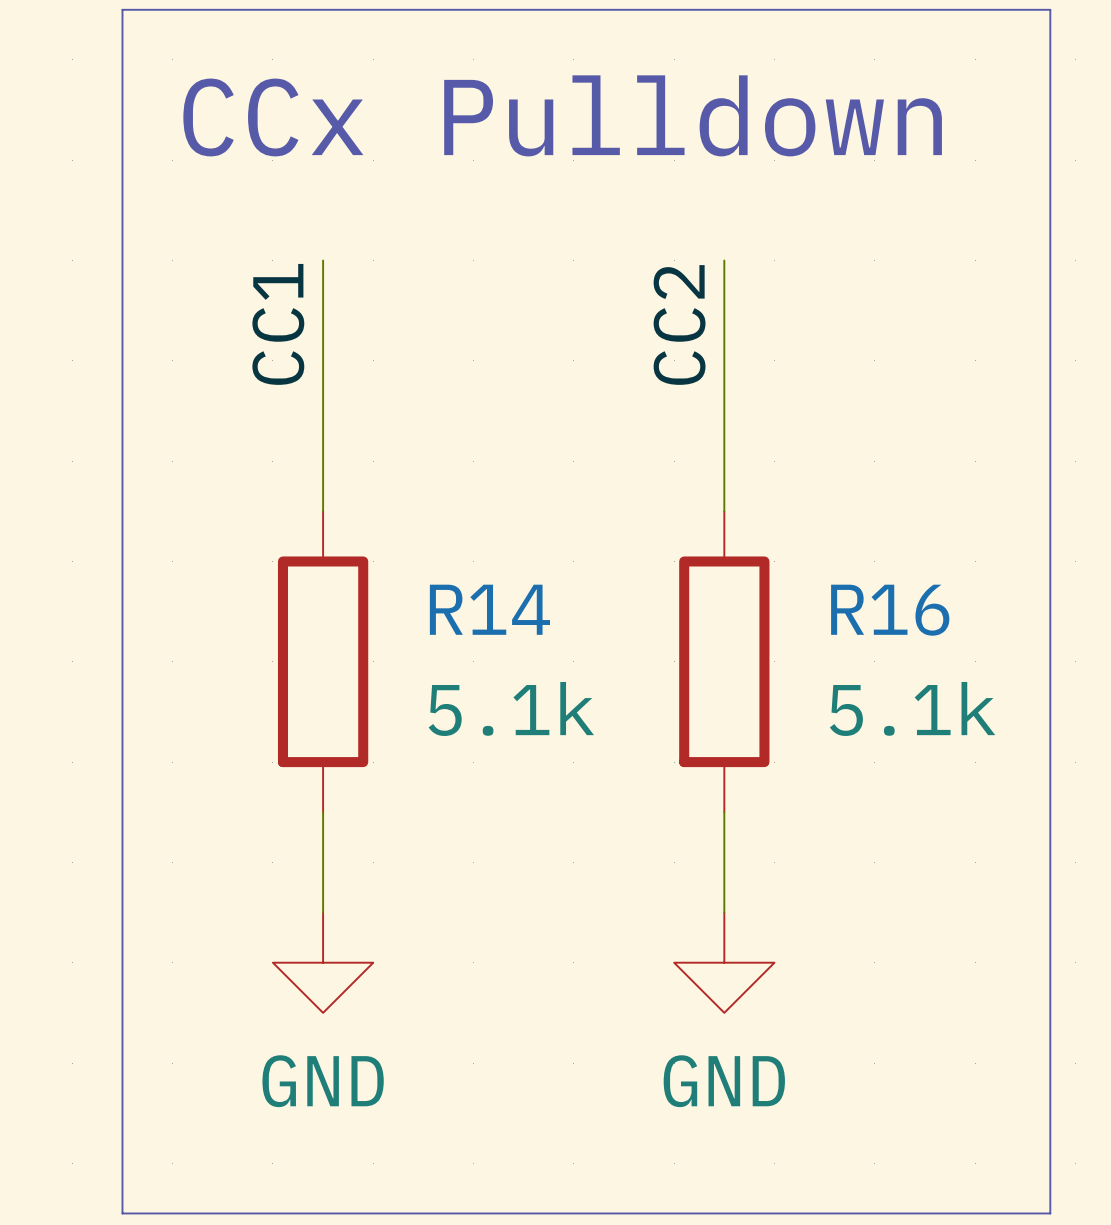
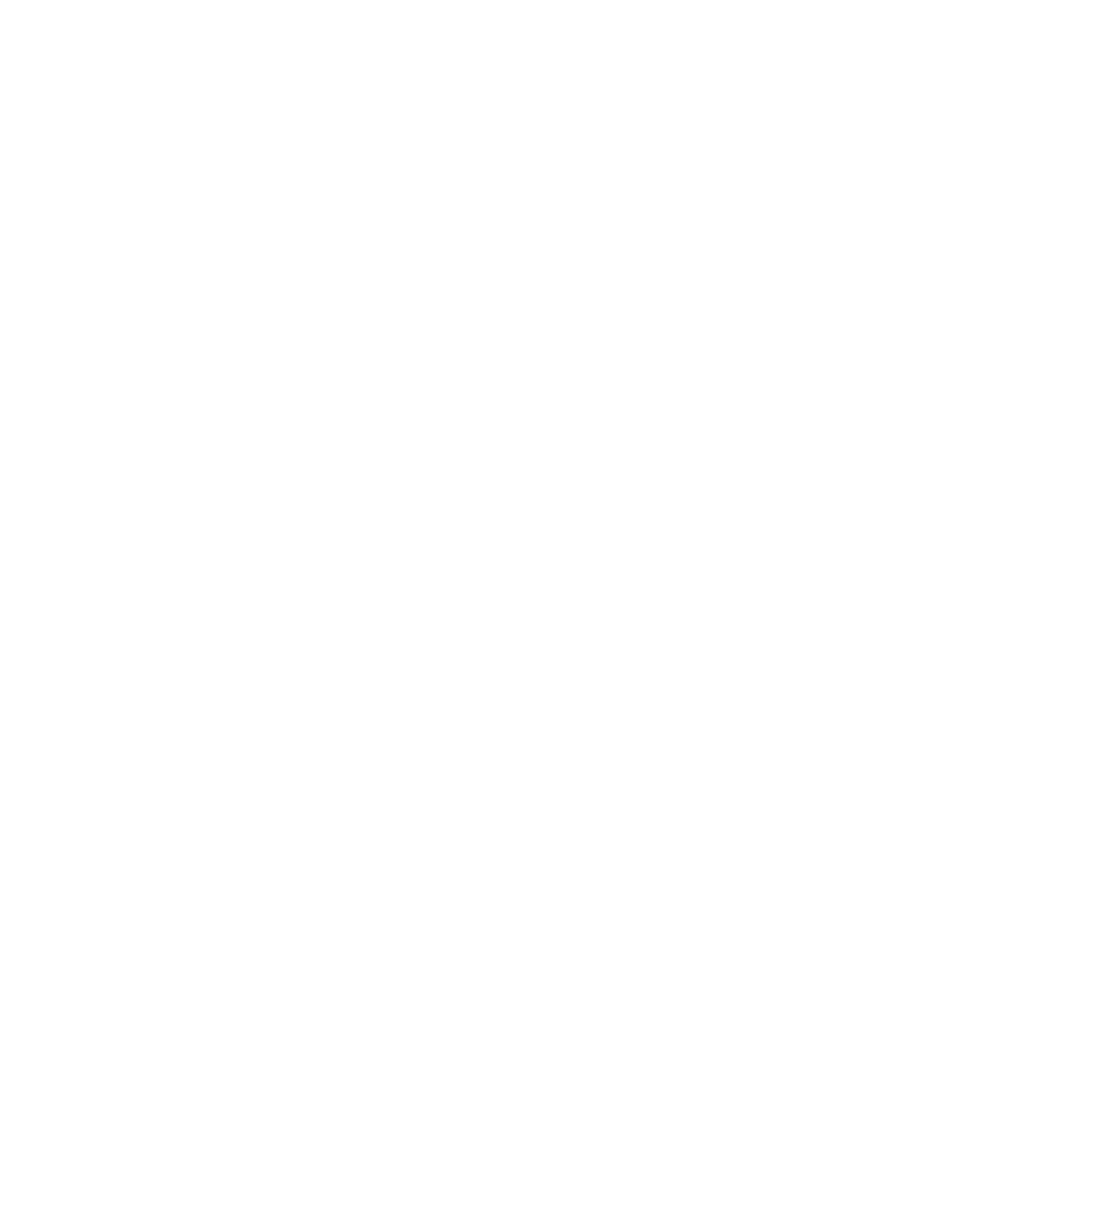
line: (122, 9) (1050, 9) (1050, 1213) (122, 1213) (122, 9) -> none
text: CCx Pulldown (562, 115) -> none
wire: (323, 260) (323, 511) -> none
wire: (724, 260) (724, 511) -> none
label: CC1 (278, 324) -> none
label: CC2 (679, 324) -> none
R14: 5.1k (323, 661) -> none
R16: 5.1k (724, 661) -> none
wire: (323, 812) (323, 912) -> none
wire: (724, 812) (724, 912) -> none
power symbol: GND (323, 962) -> none
power symbol: GND (724, 962) -> none

